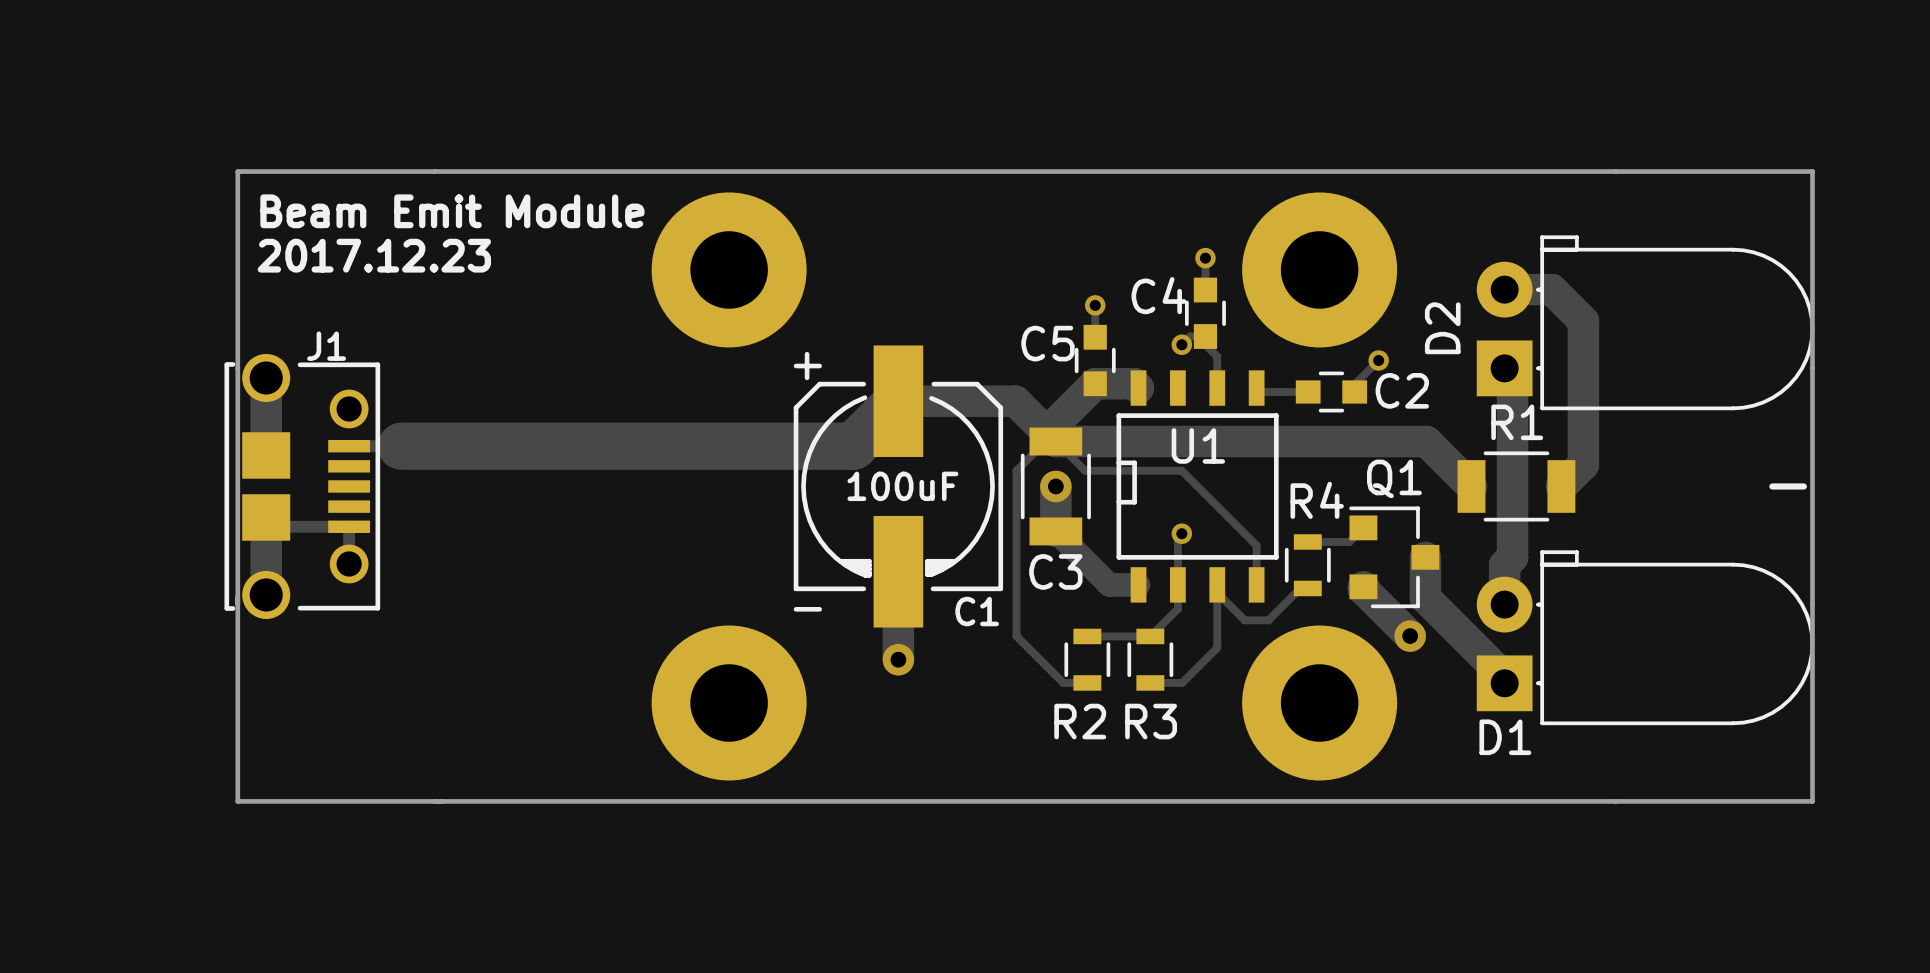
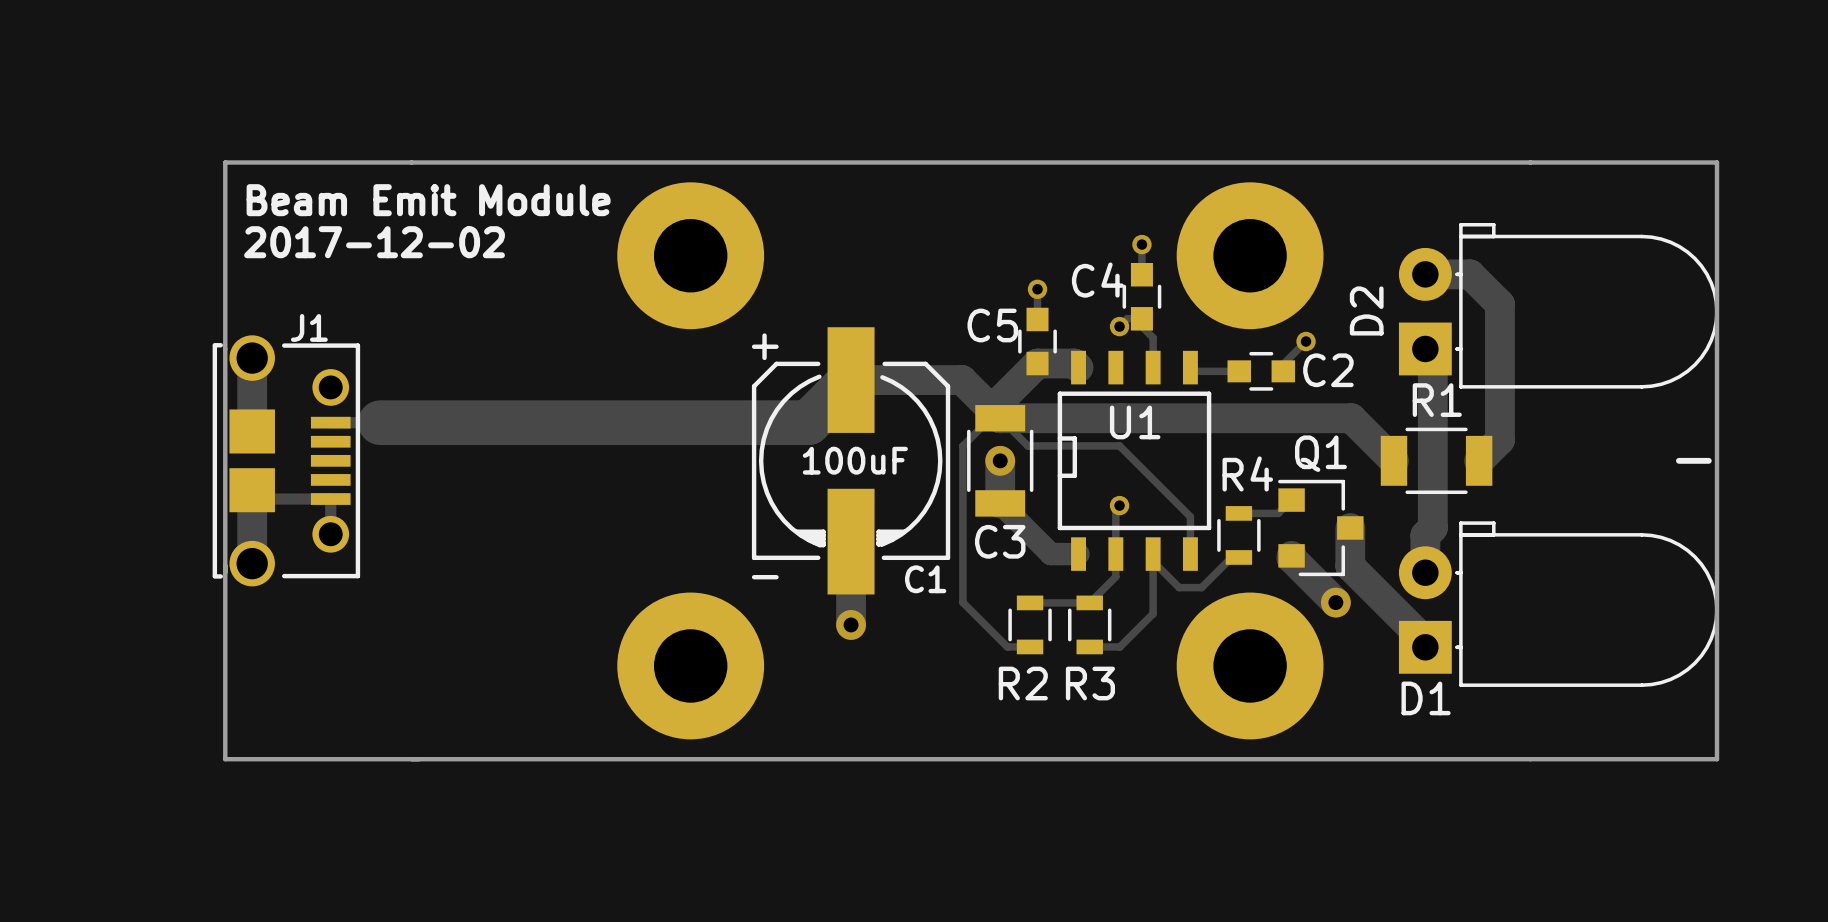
text: 2017.12.23 (374, 255) -> 2017-12-02 (374, 242)

